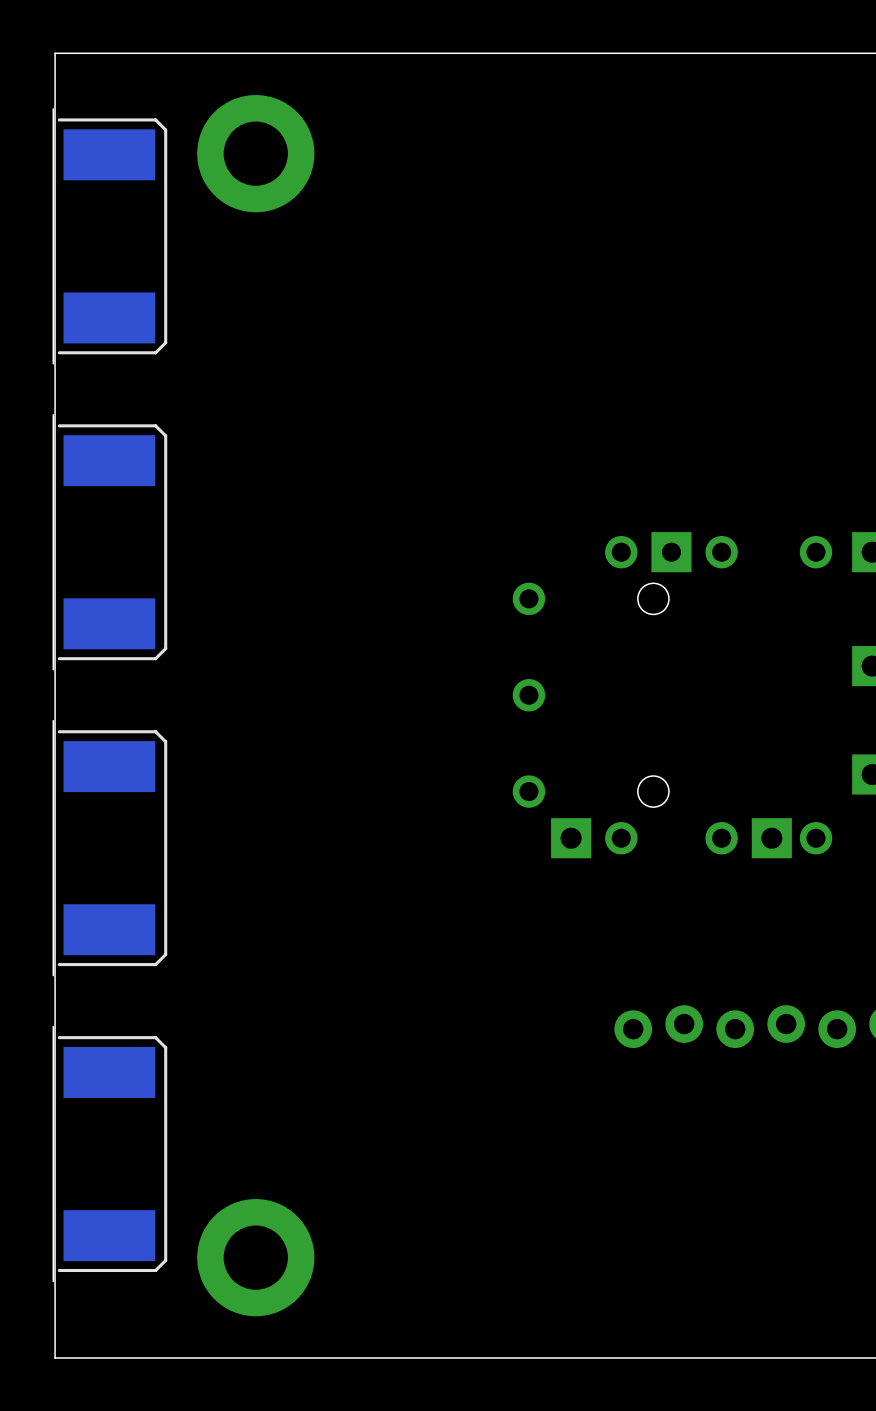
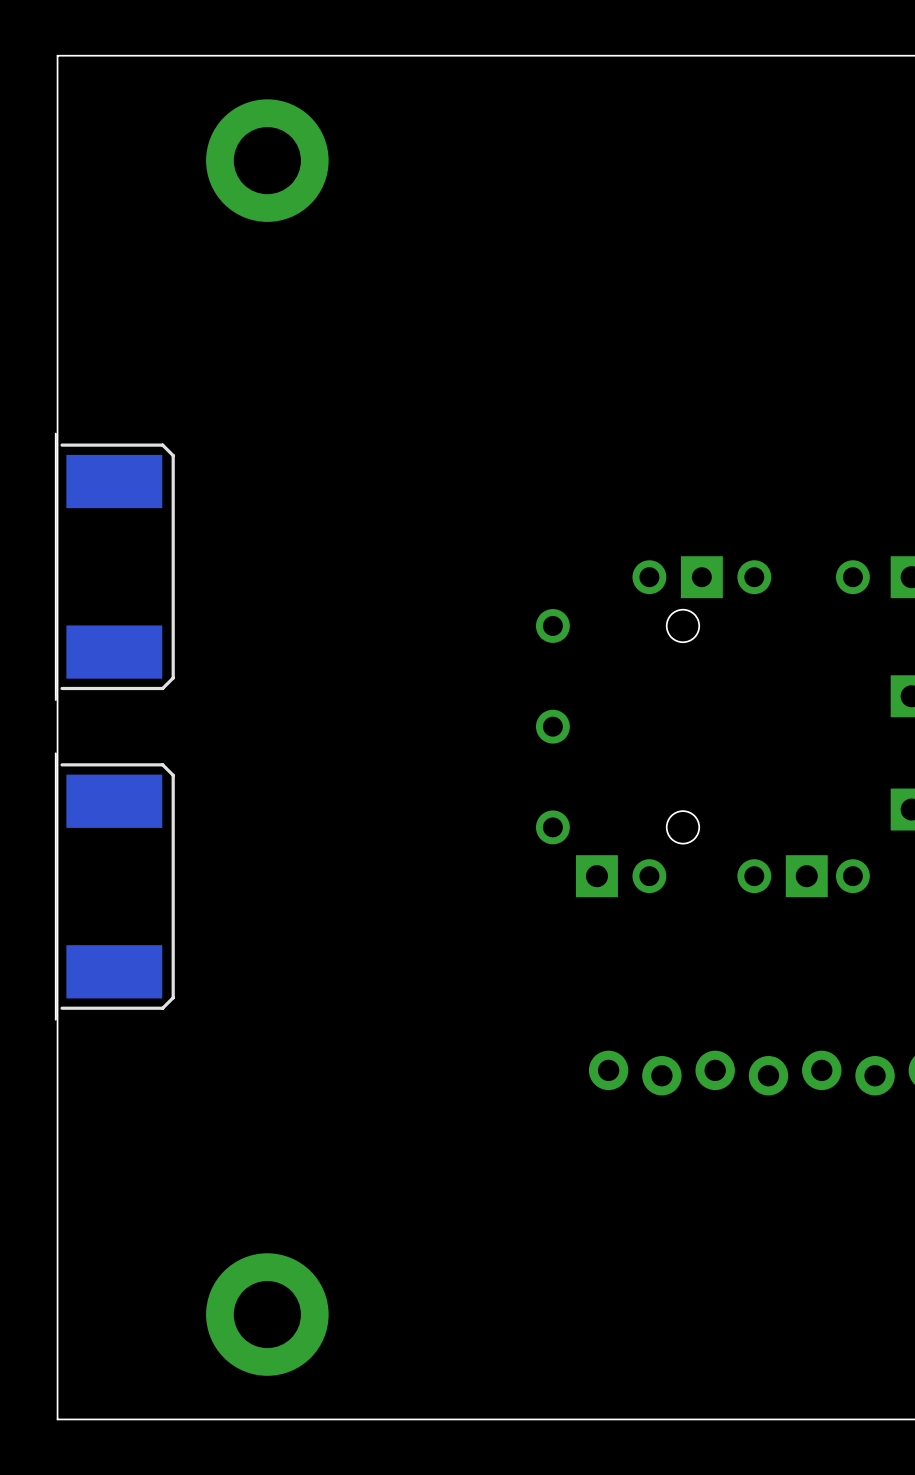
part: (110, 236) -> none
part: none -> (715, 1073)
part: (110, 1154) -> none

